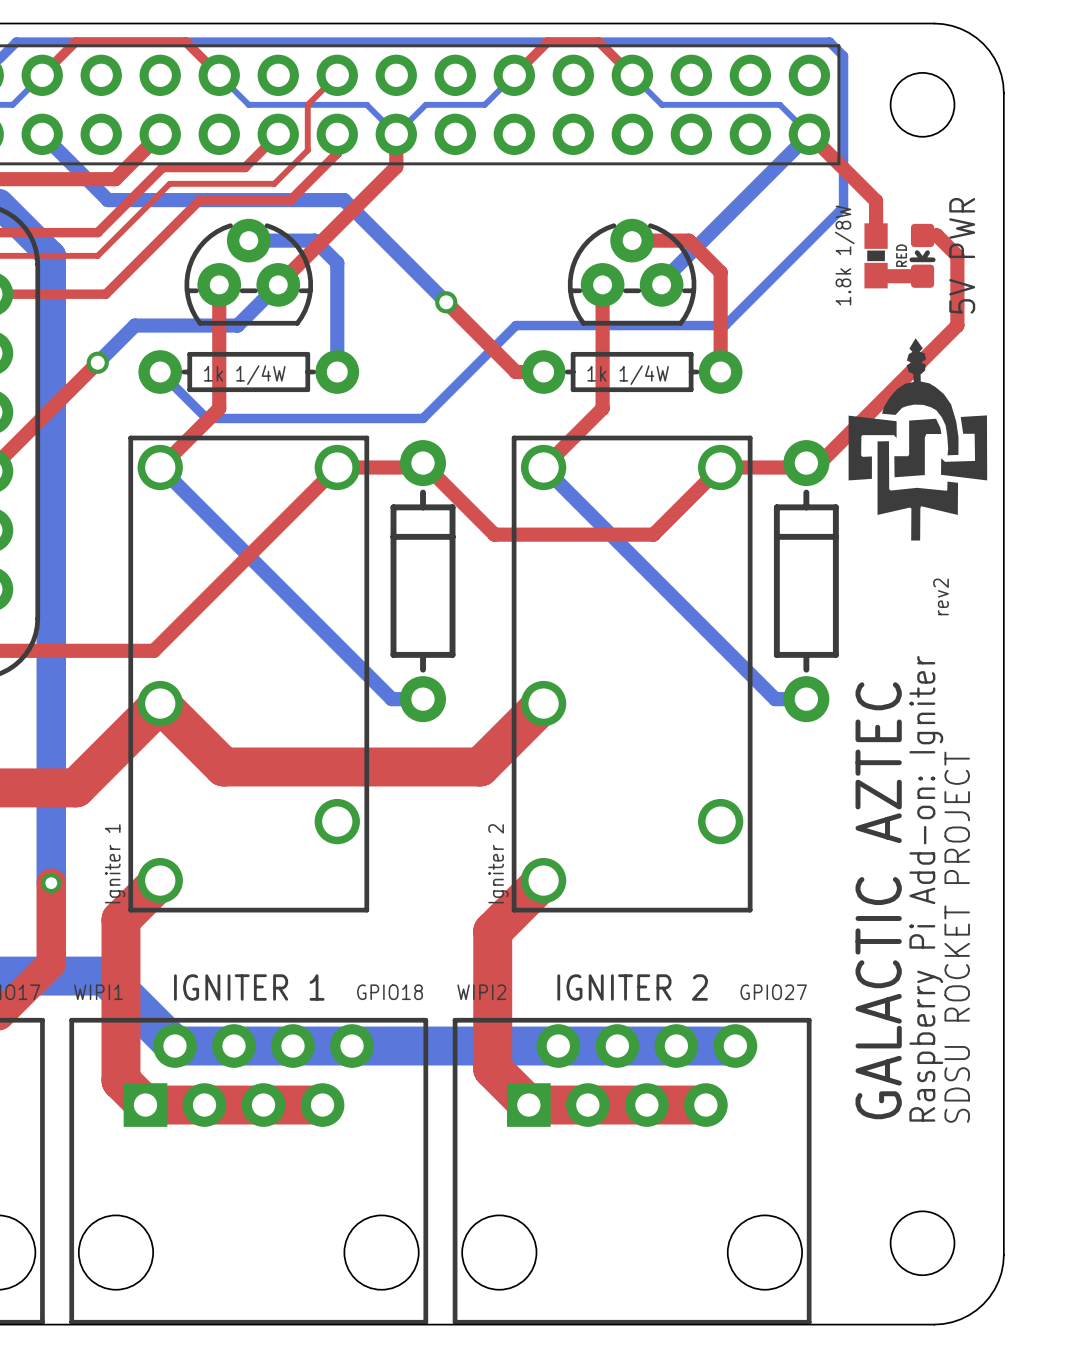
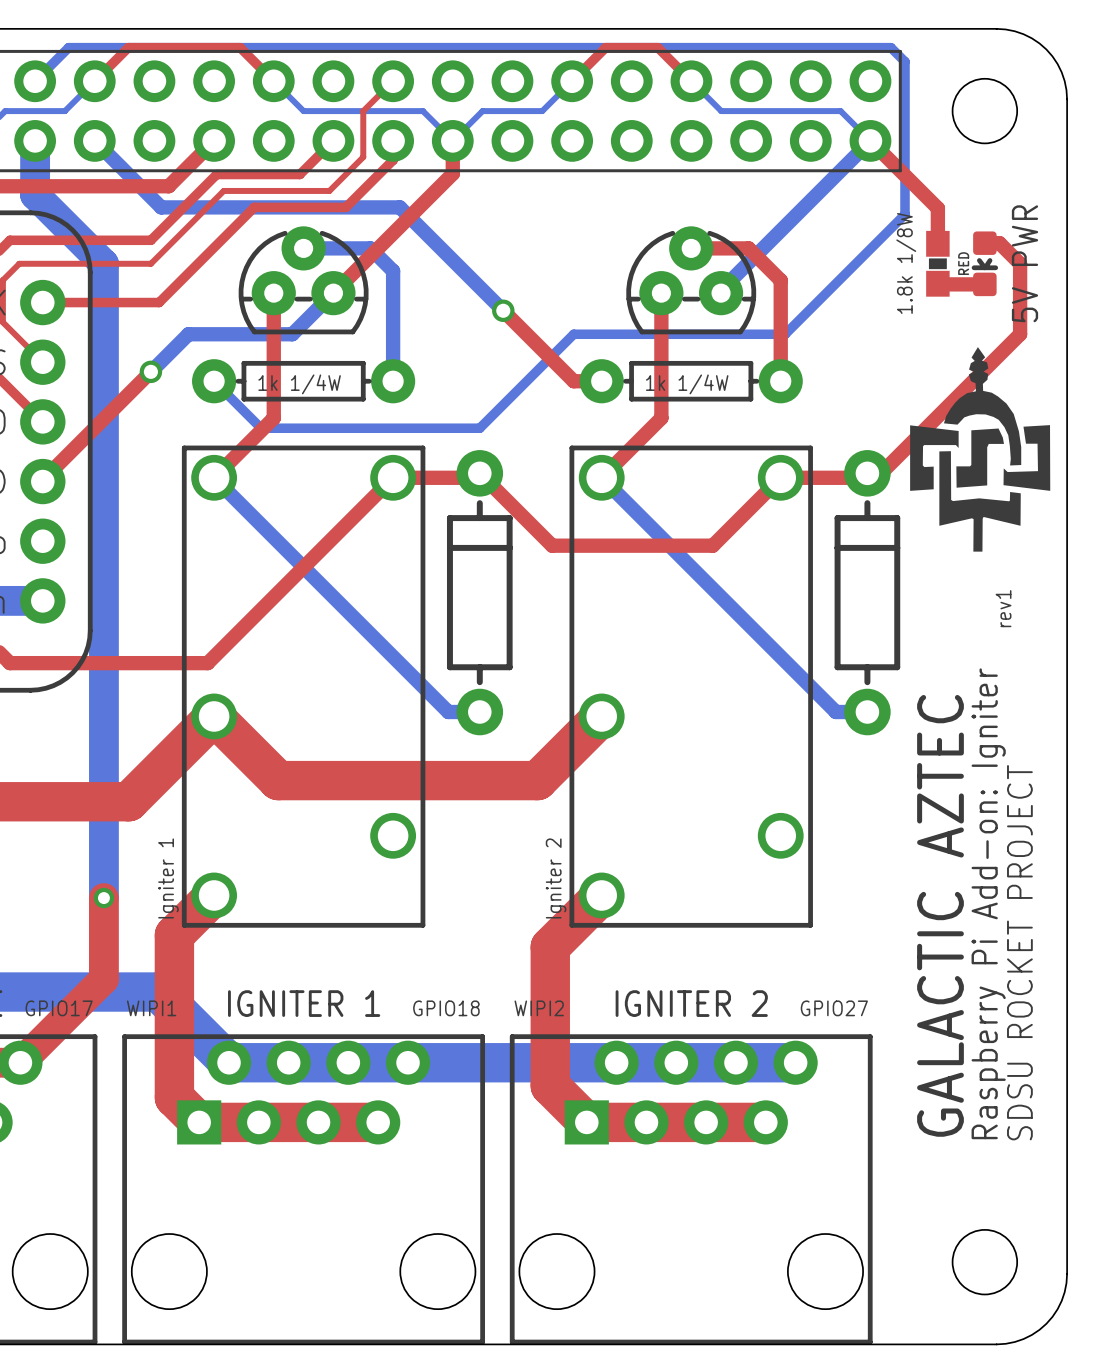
text: rev2 (941, 596) -> rev1 (1003, 608)

